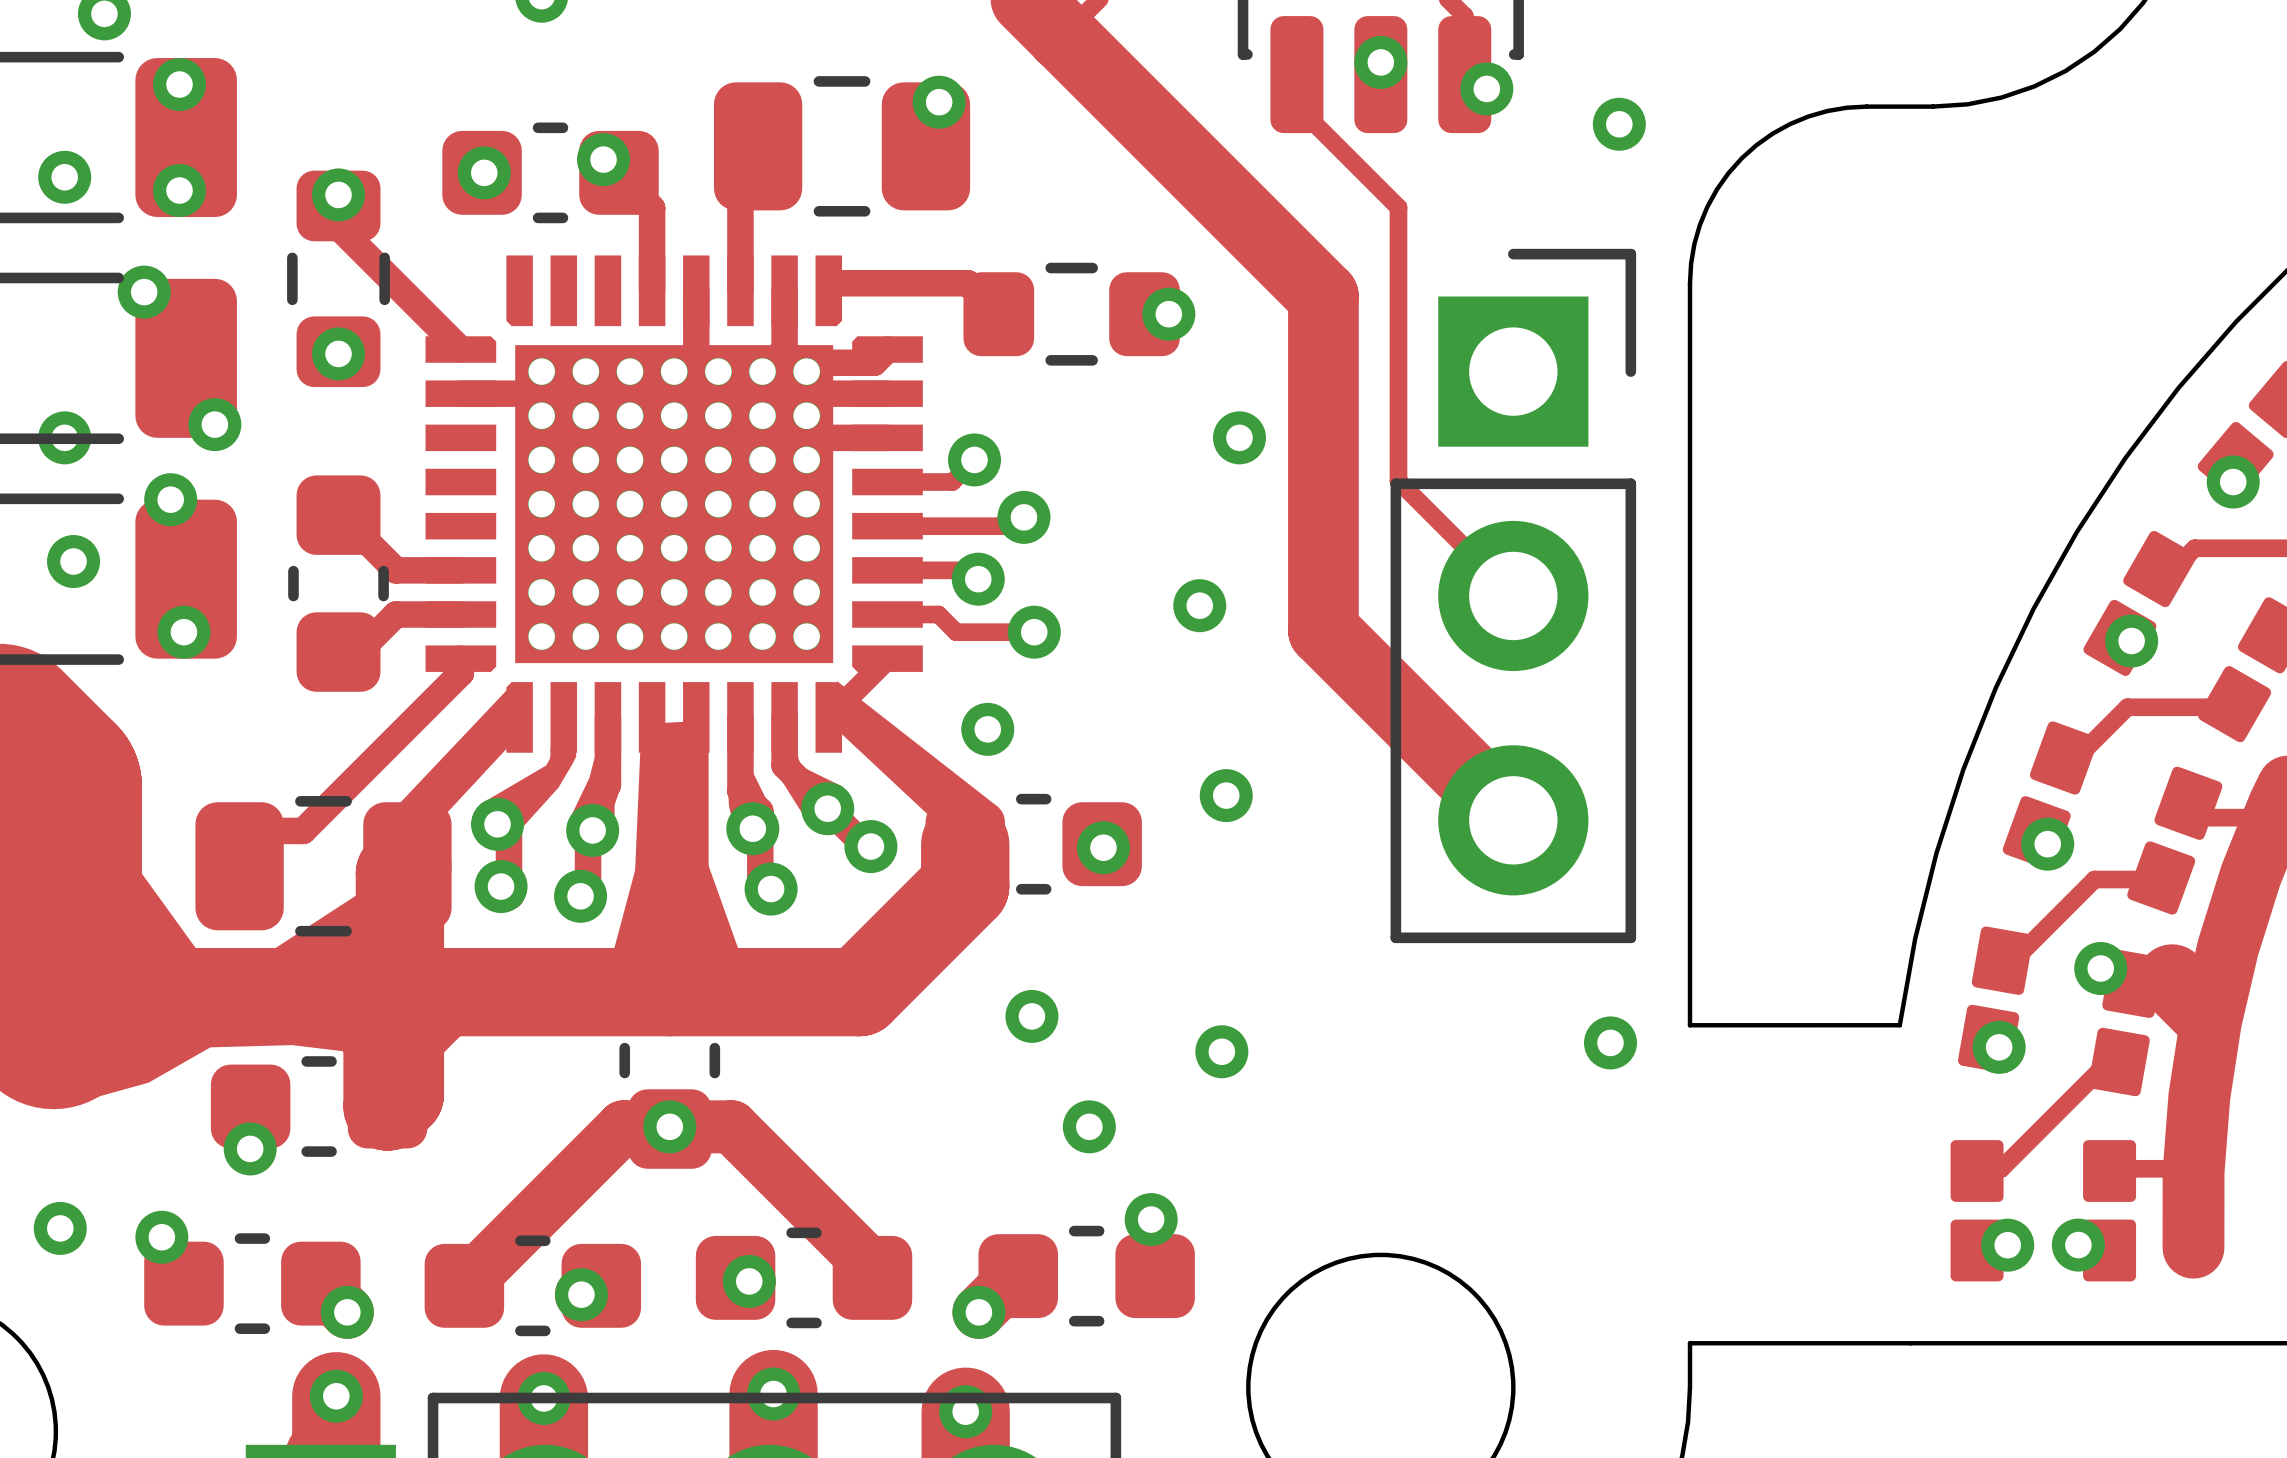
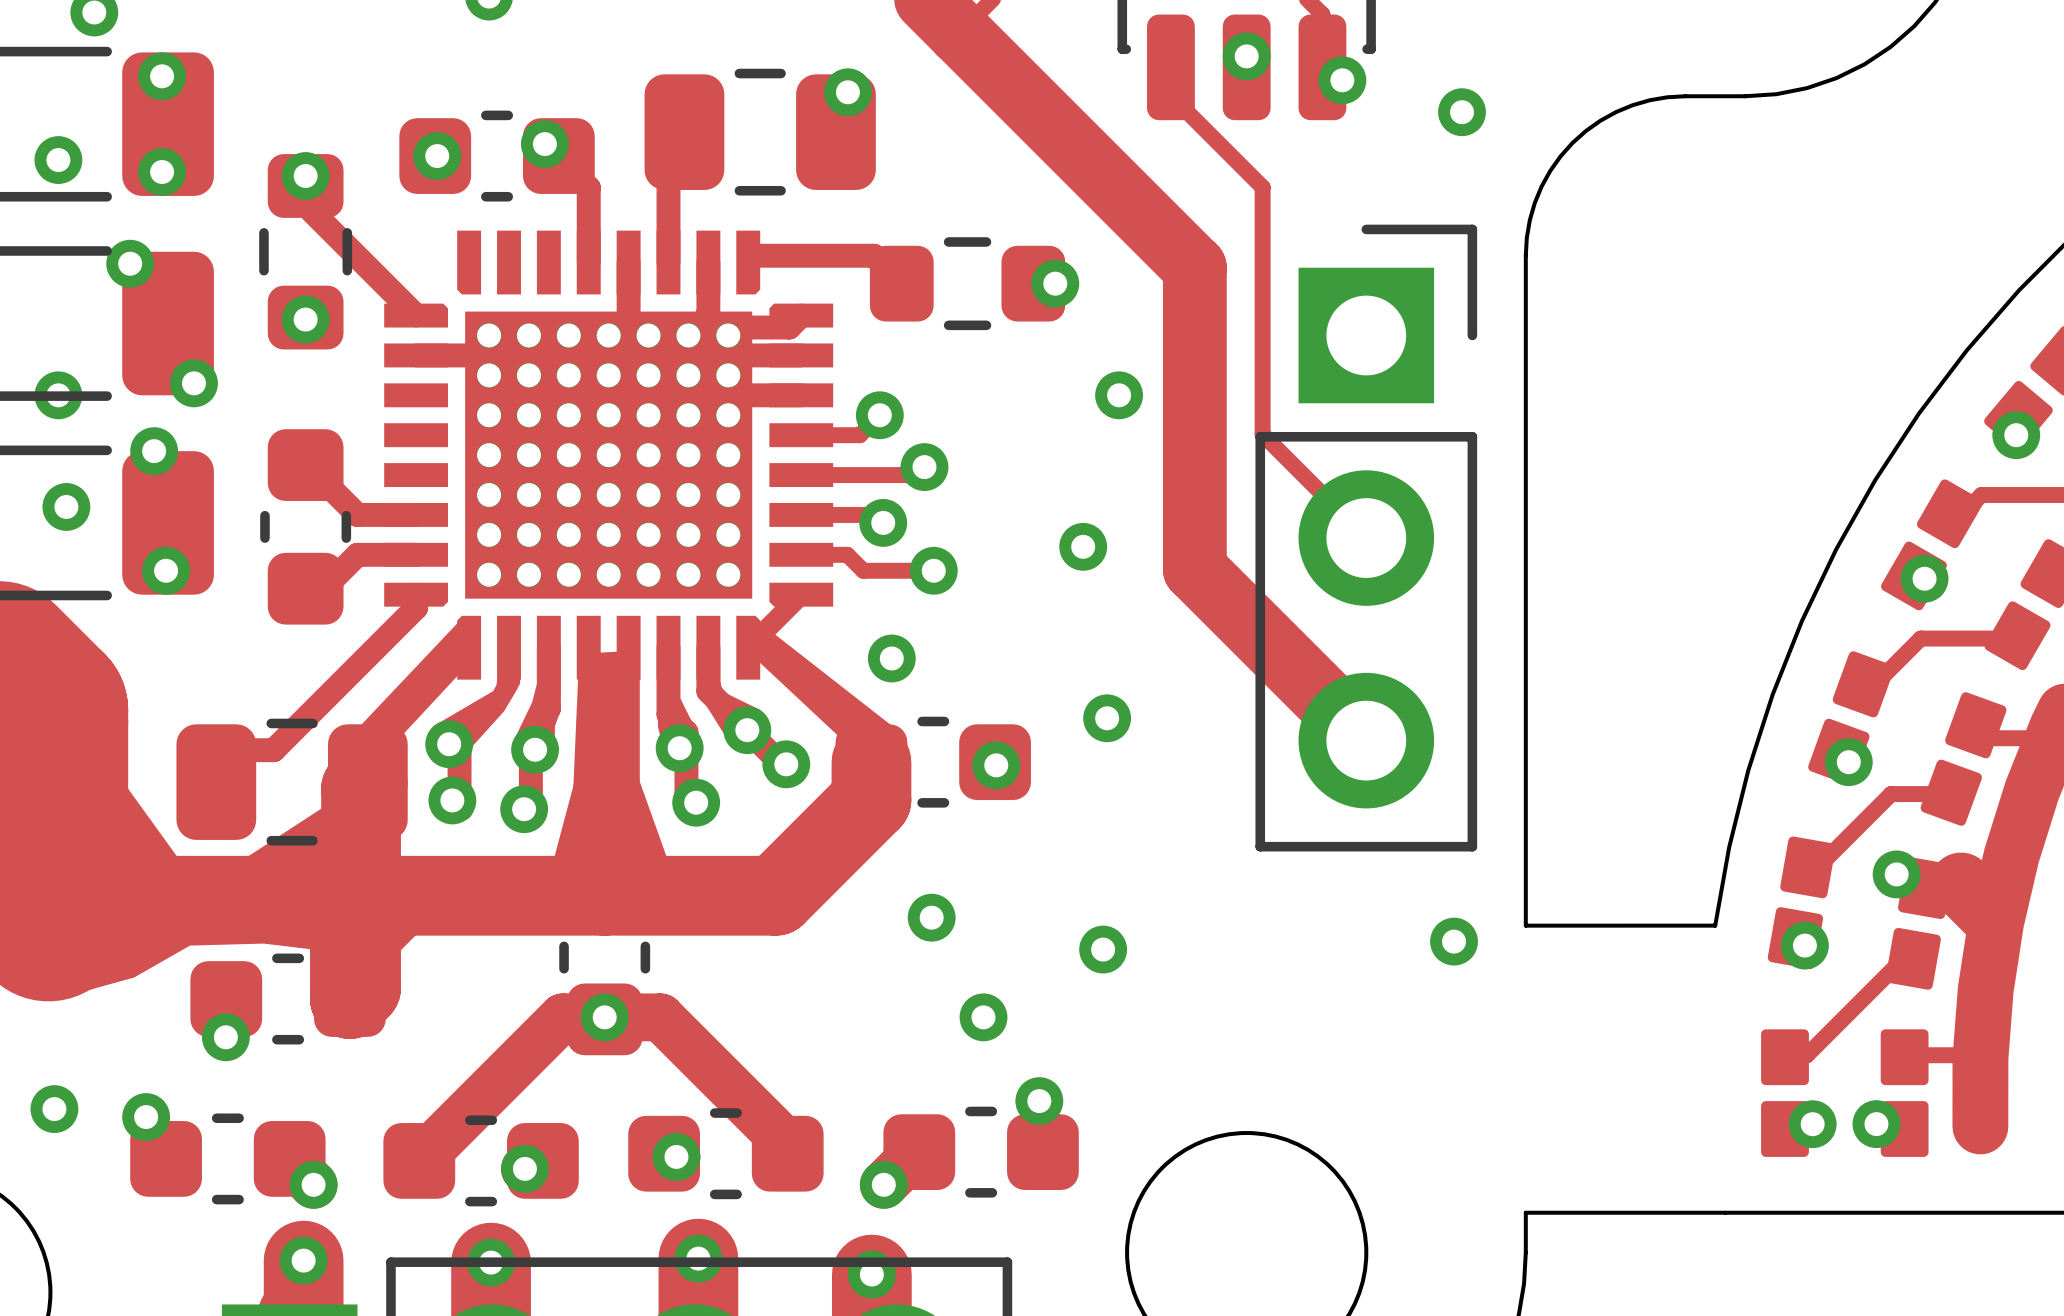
drawing shape: [823, 681, 999, 818] -> [743, 621, 904, 739]

